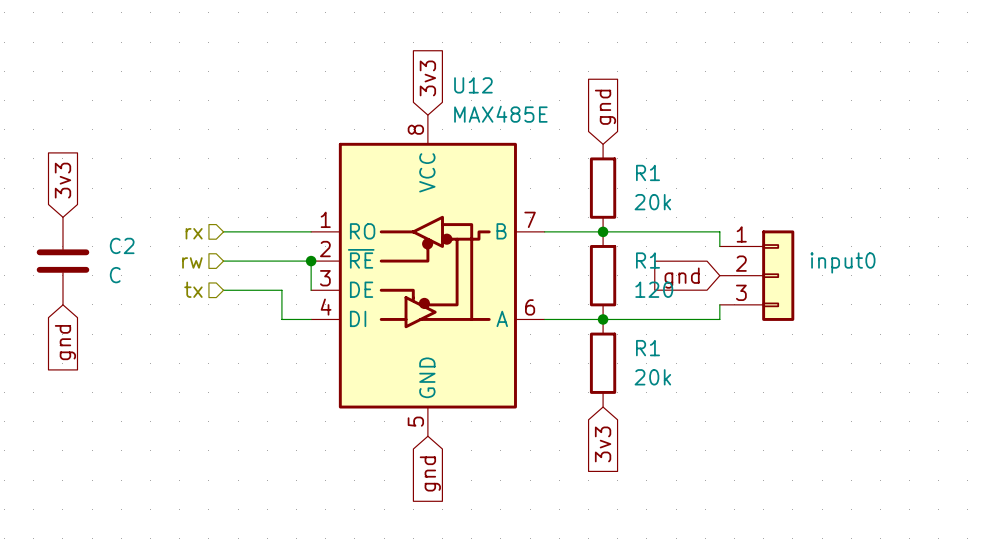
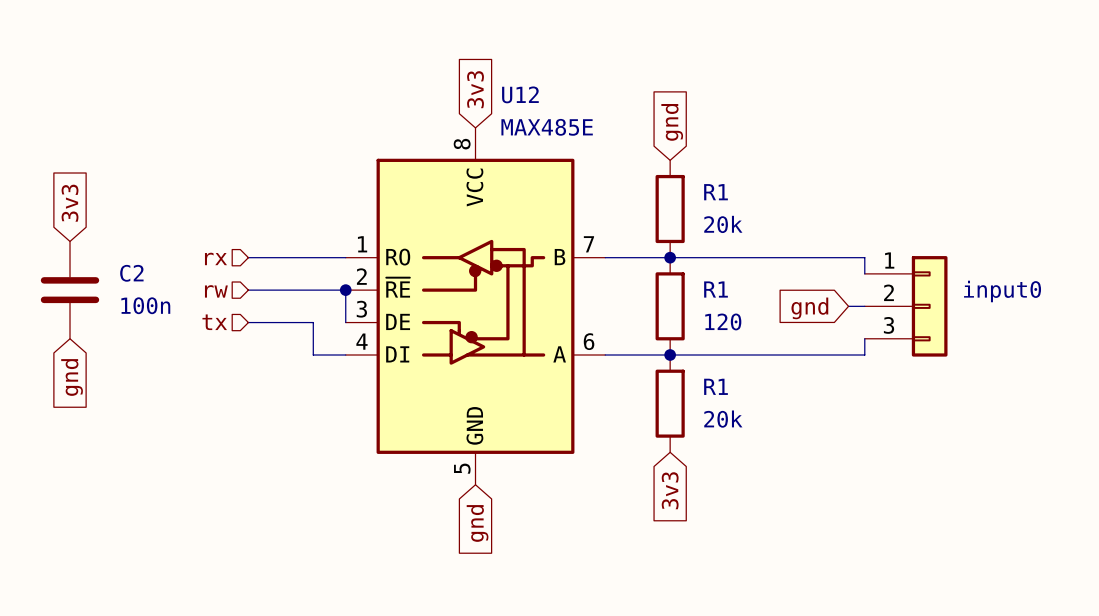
wire: (719, 231) (719, 246) -> (799, 257) (864, 257) (864, 273)
C2 value: C (115, 275) -> 100n (145, 305)
input0 position: (757, 275) -> (906, 306)
global label position: gnd (682, 278) -> gnd (809, 308)
wire: (719, 304) (719, 319) -> (864, 338) (864, 355) (799, 355)

